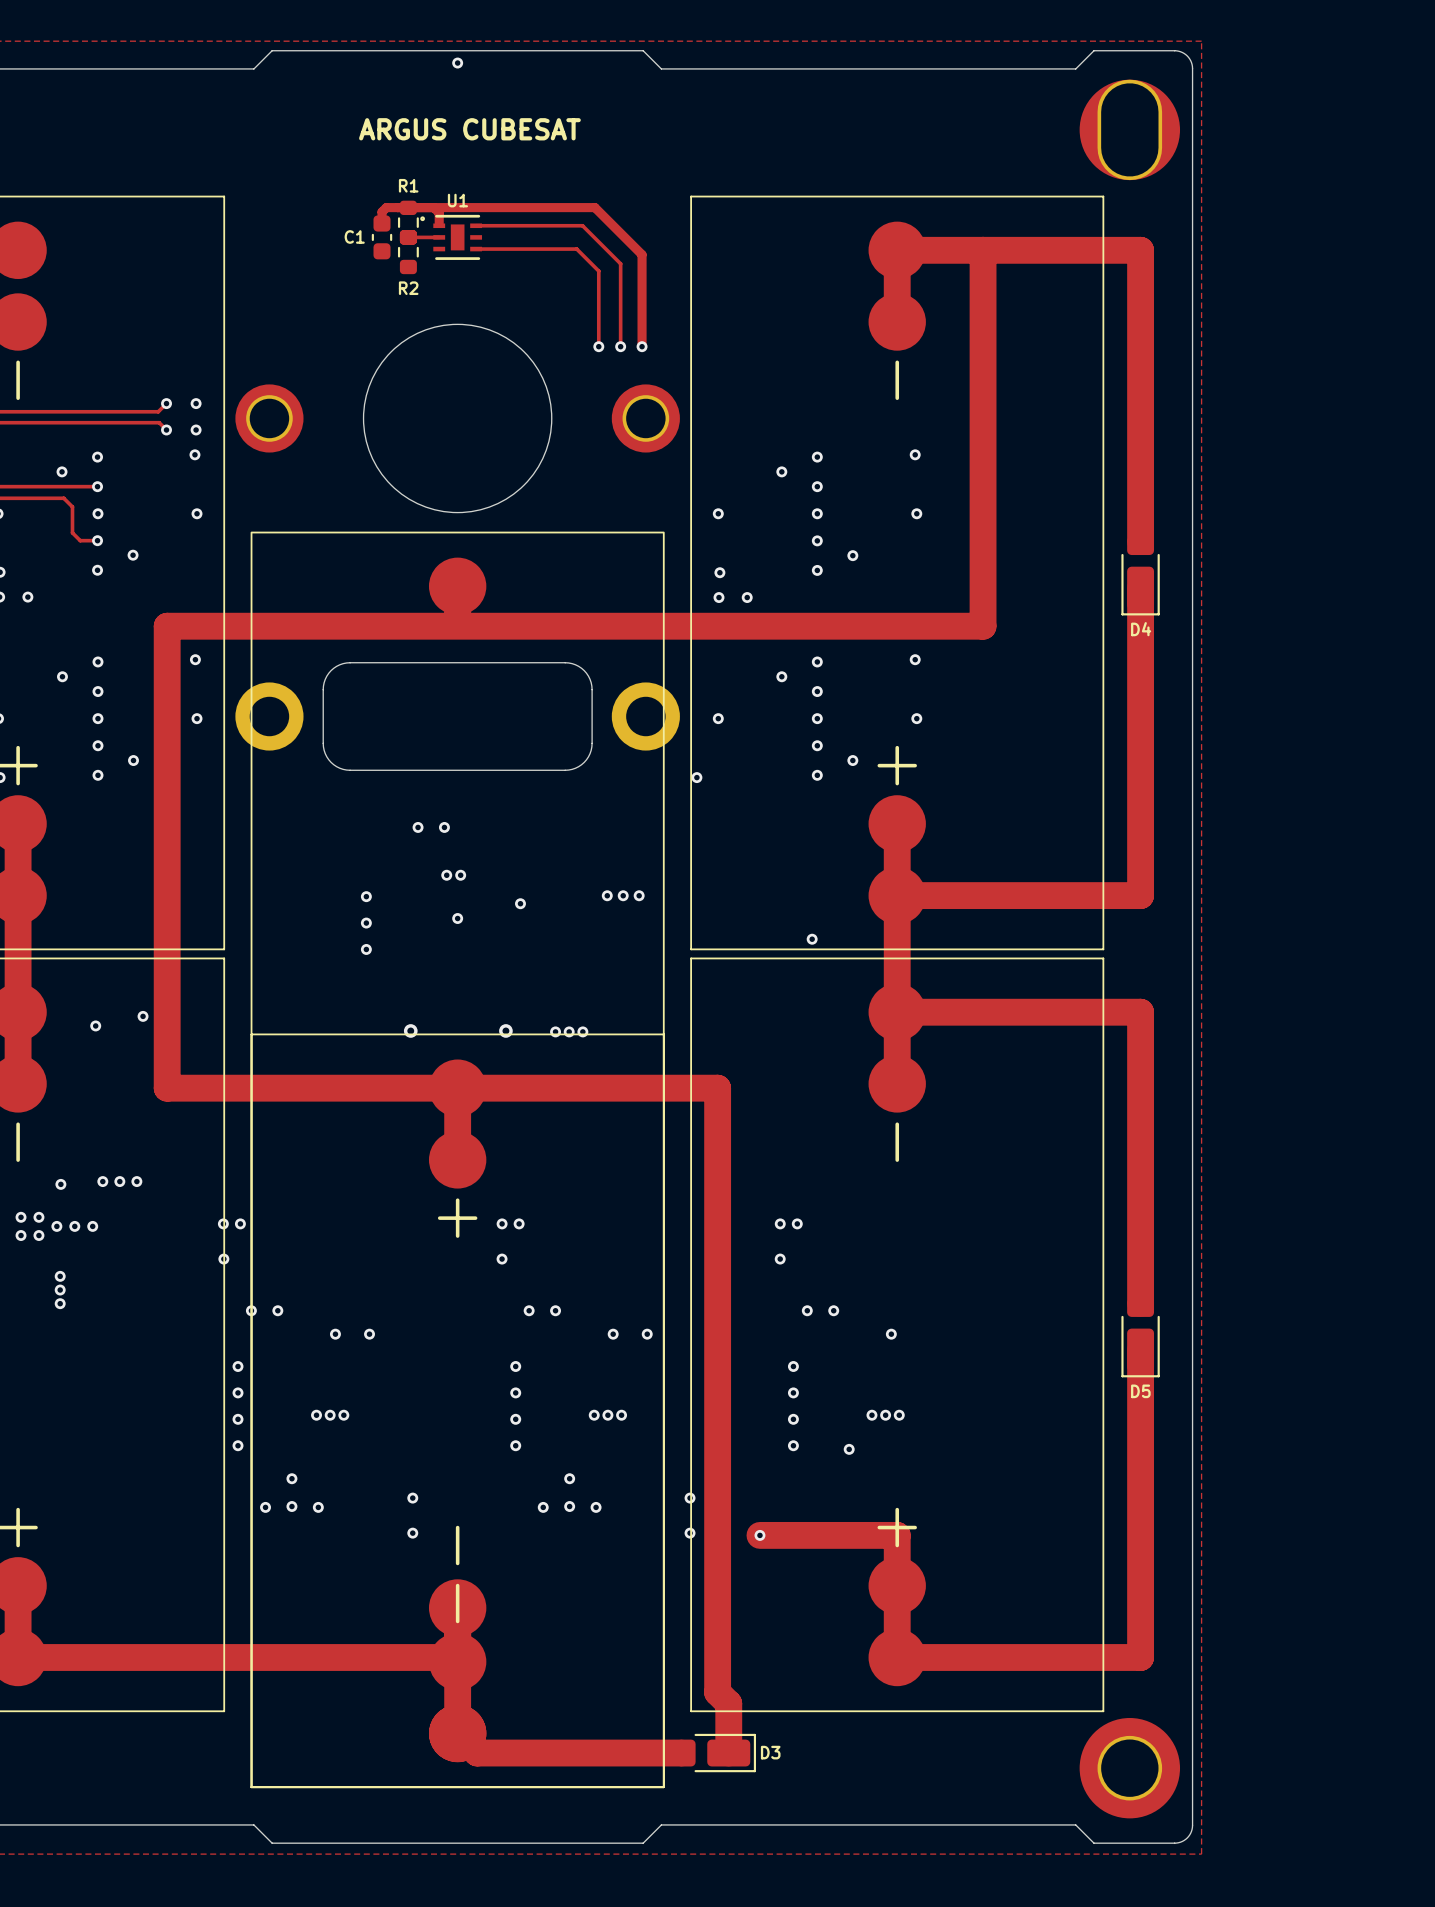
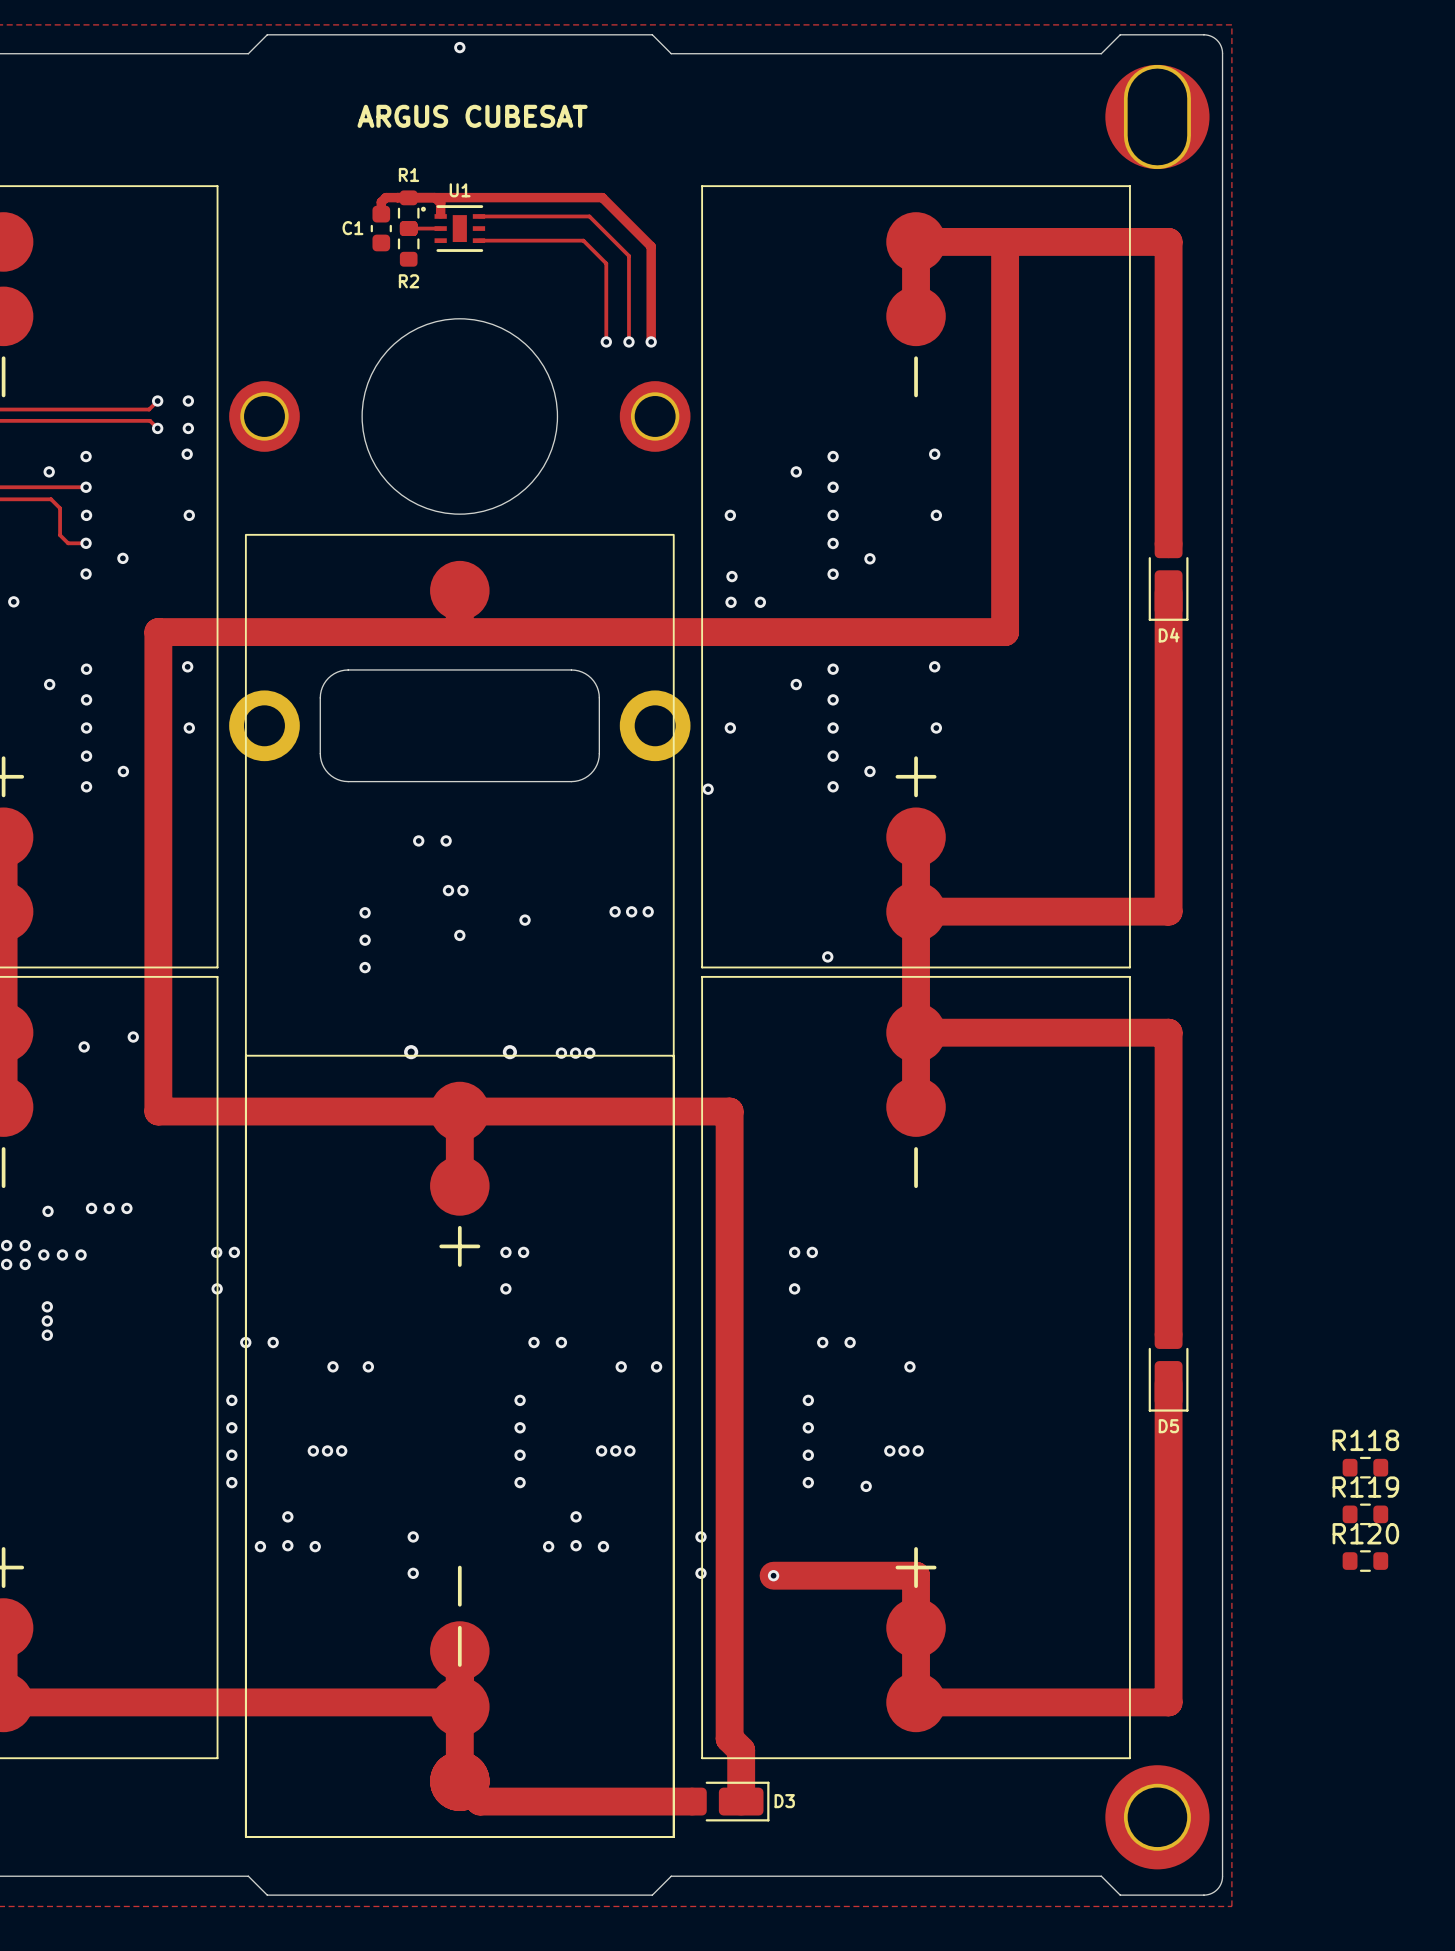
R118: none -> (1365, 1467)
R119: none -> (1365, 1514)
R120: none -> (1365, 1561)

